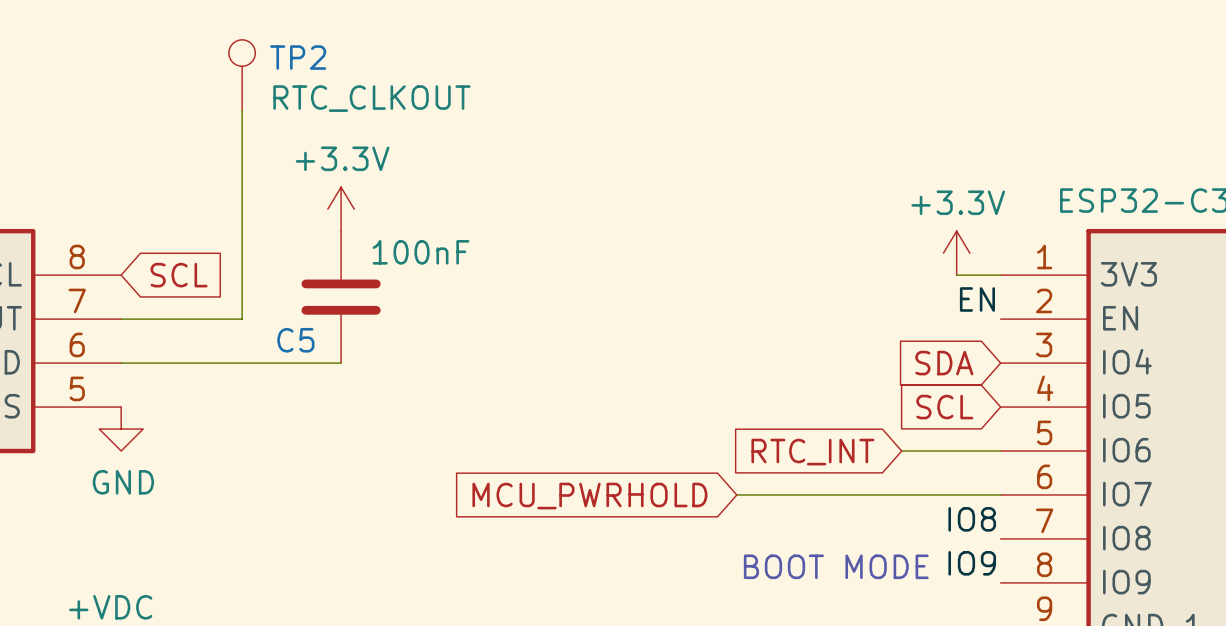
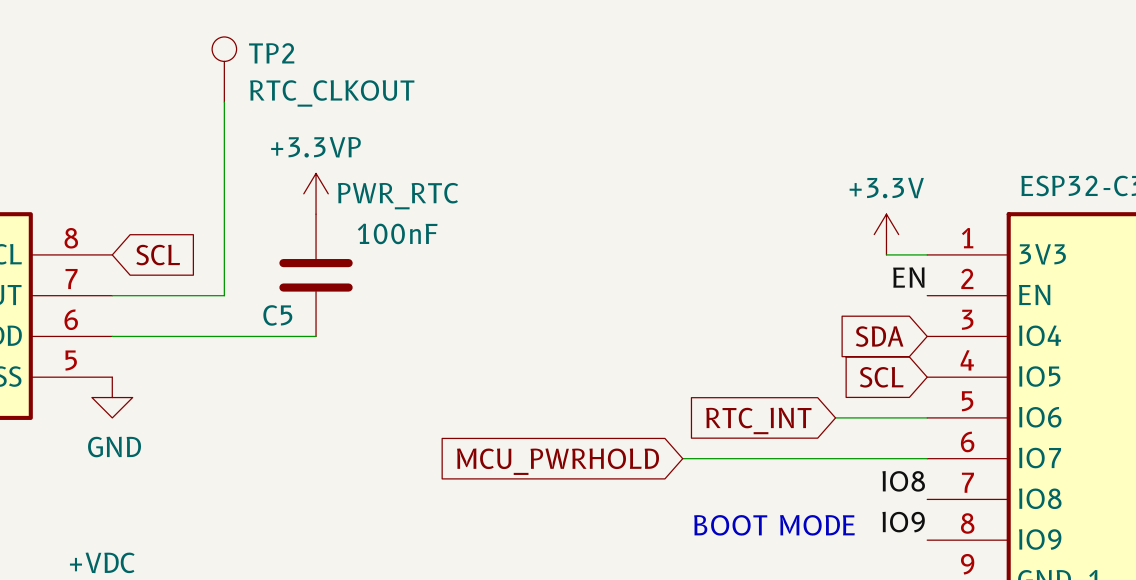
power symbol: +3.3V (341, 209) -> +3.3VP (316, 193)

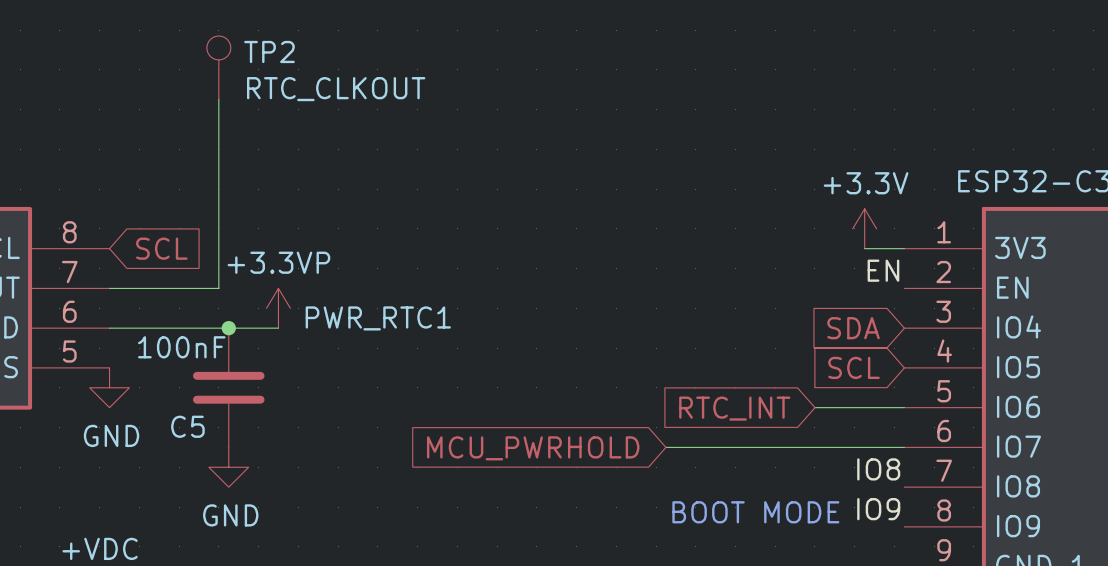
PWR_RTC: +3.3VP (316, 193) -> none
C5 value position: 100nF (397, 233) -> 100nF (181, 347)
C5 position: (316, 275) -> (228, 387)
PWR_RTC1: none -> +3.3VP (278, 308)
junction: none -> (228, 328)
wire: (285, 336) (316, 336) -> none
power symbol: none -> GND (228, 467)

